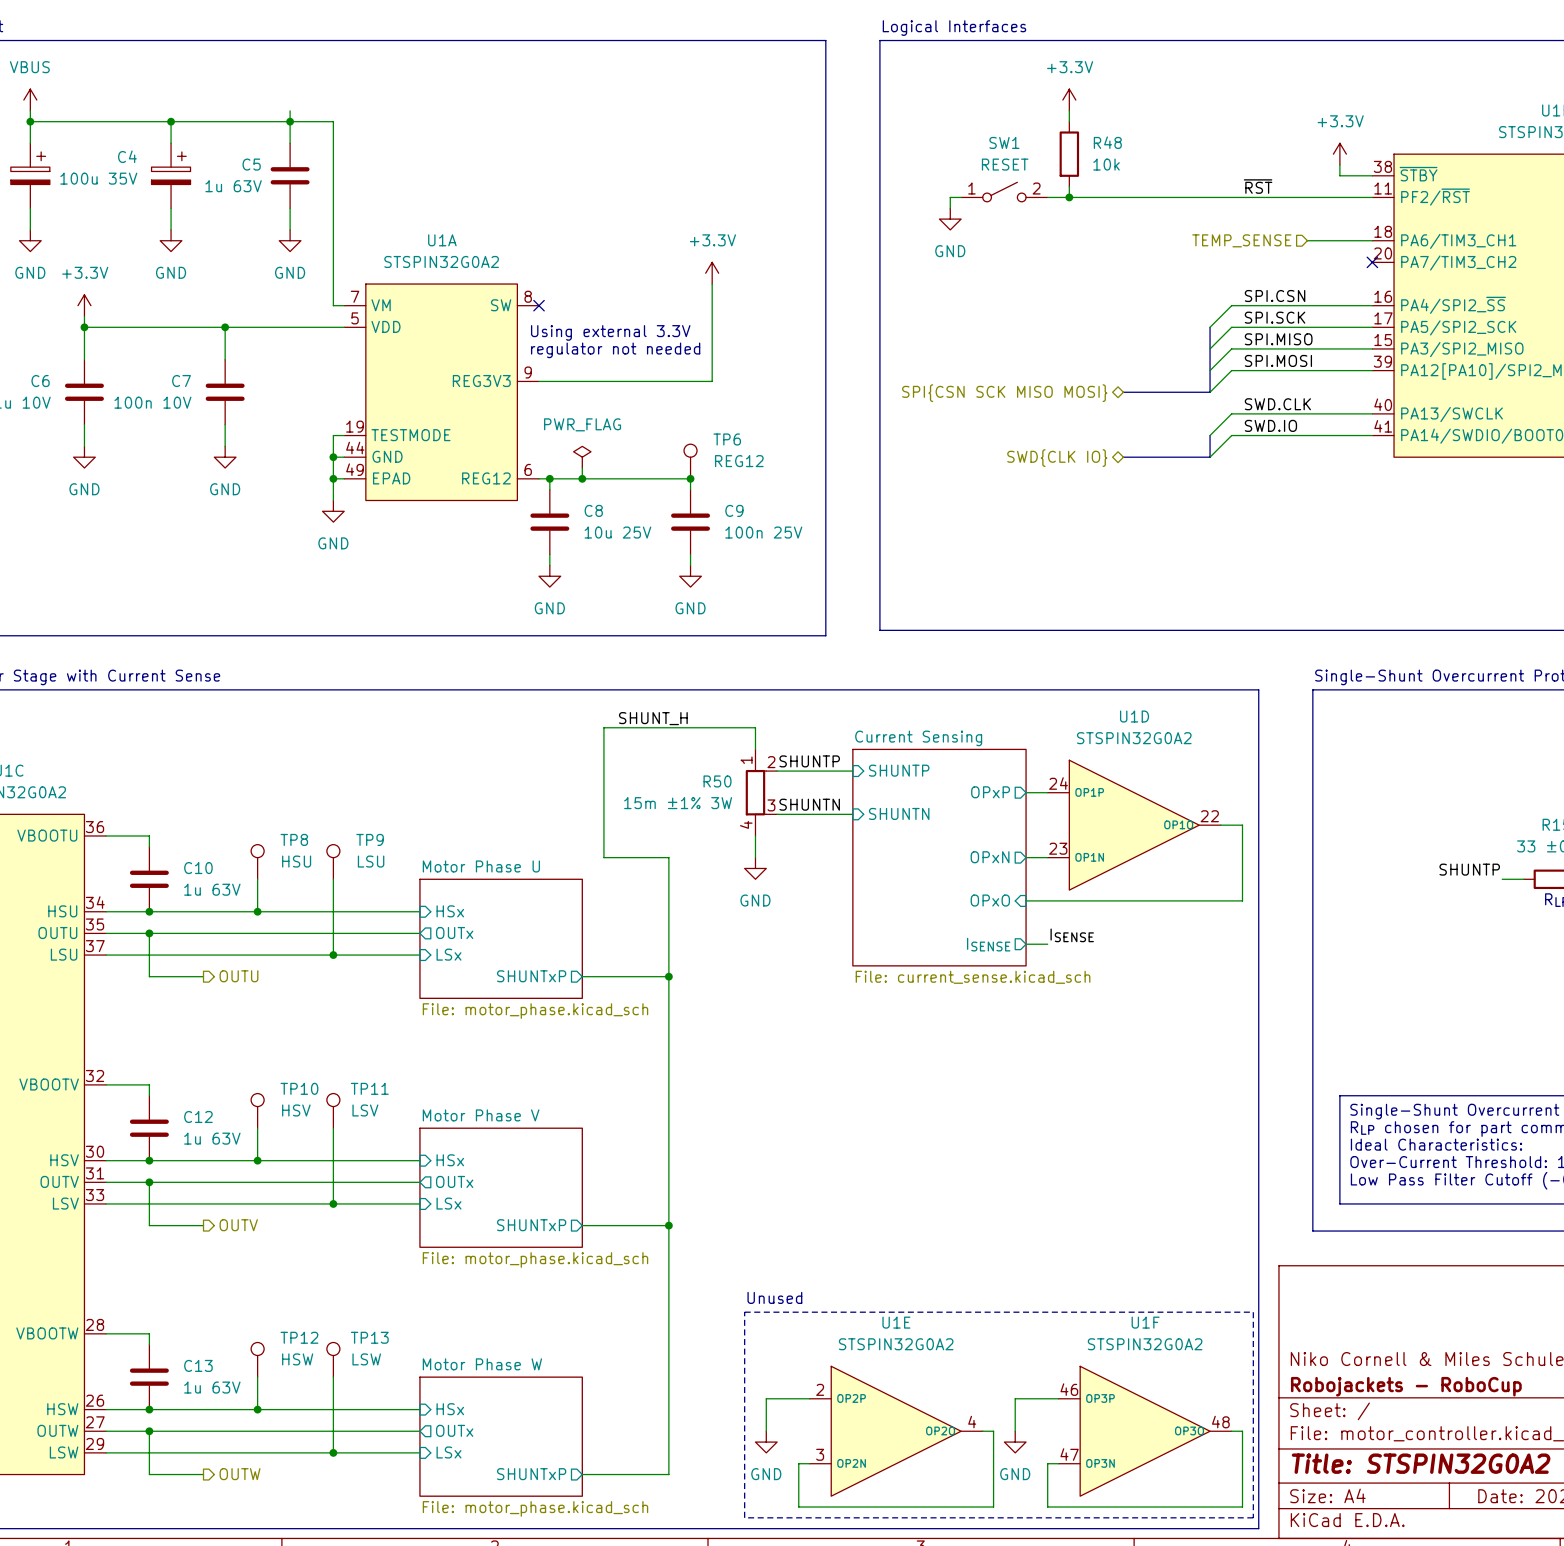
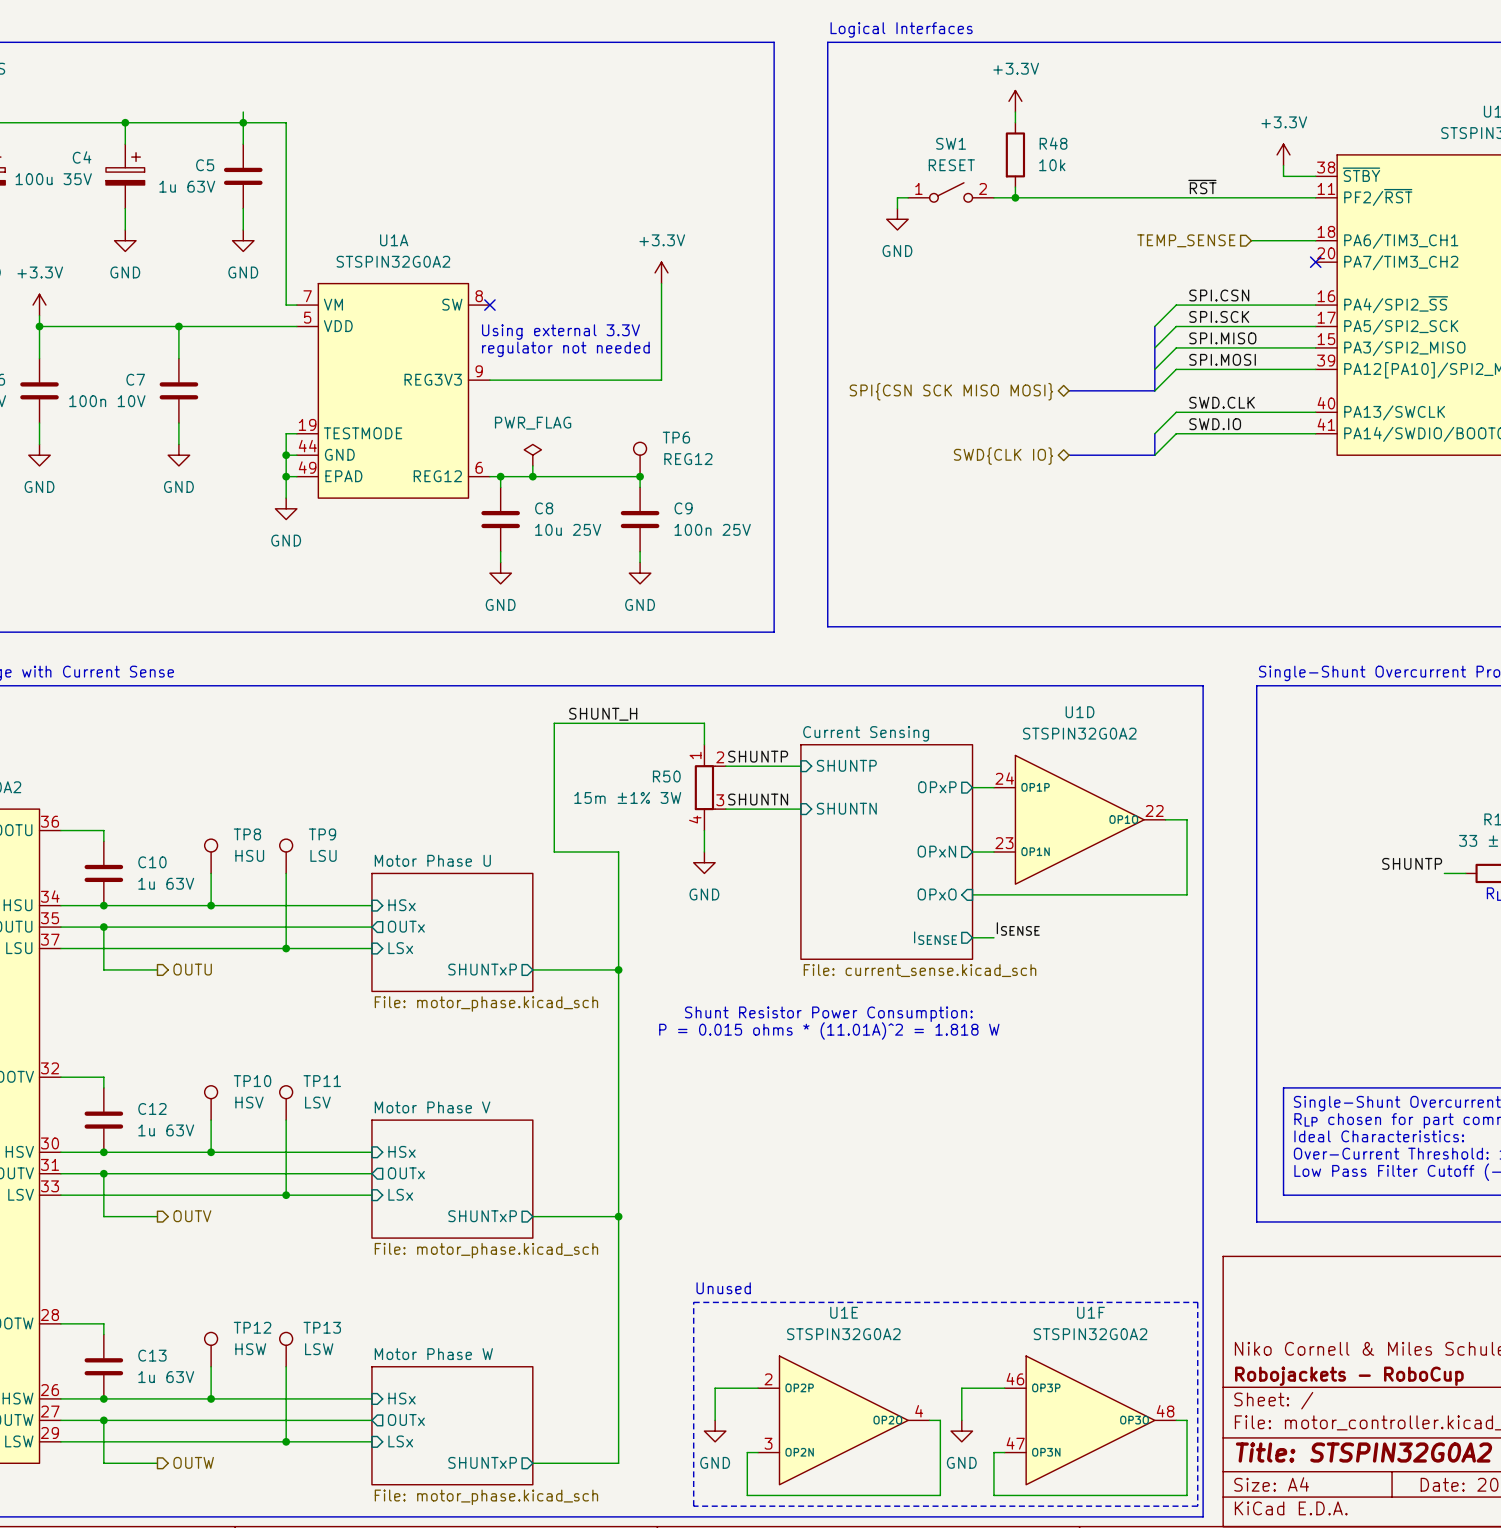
text: none -> Shunt Resistor Power Consumption: (828, 1014)
text: none -> P = 0.015 ohms * (11.01A)^2 = 1.818 W (829, 1030)

